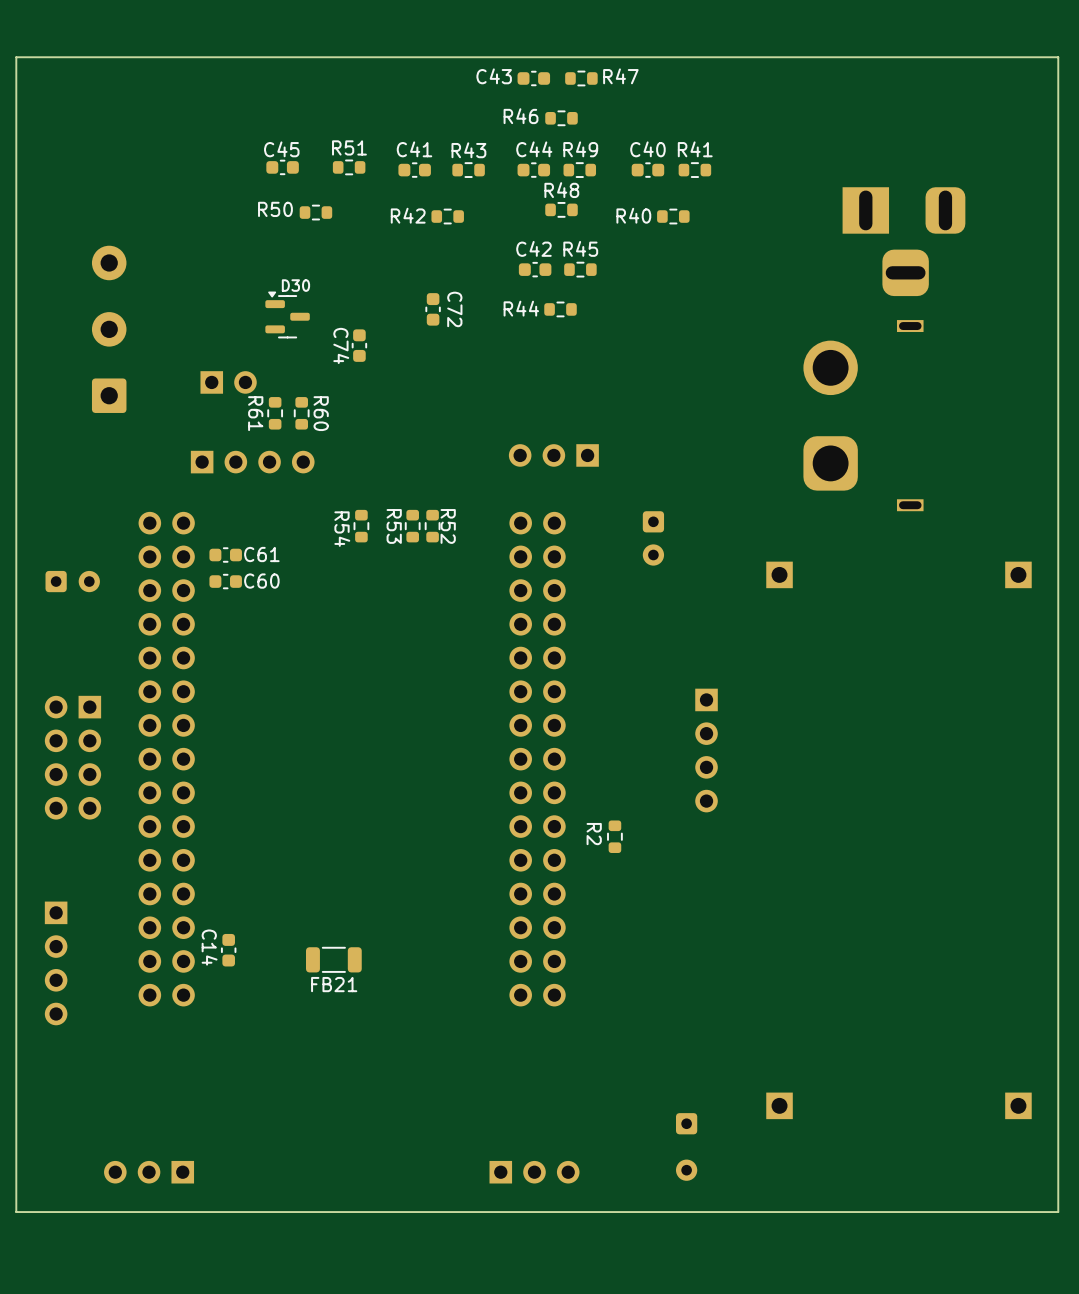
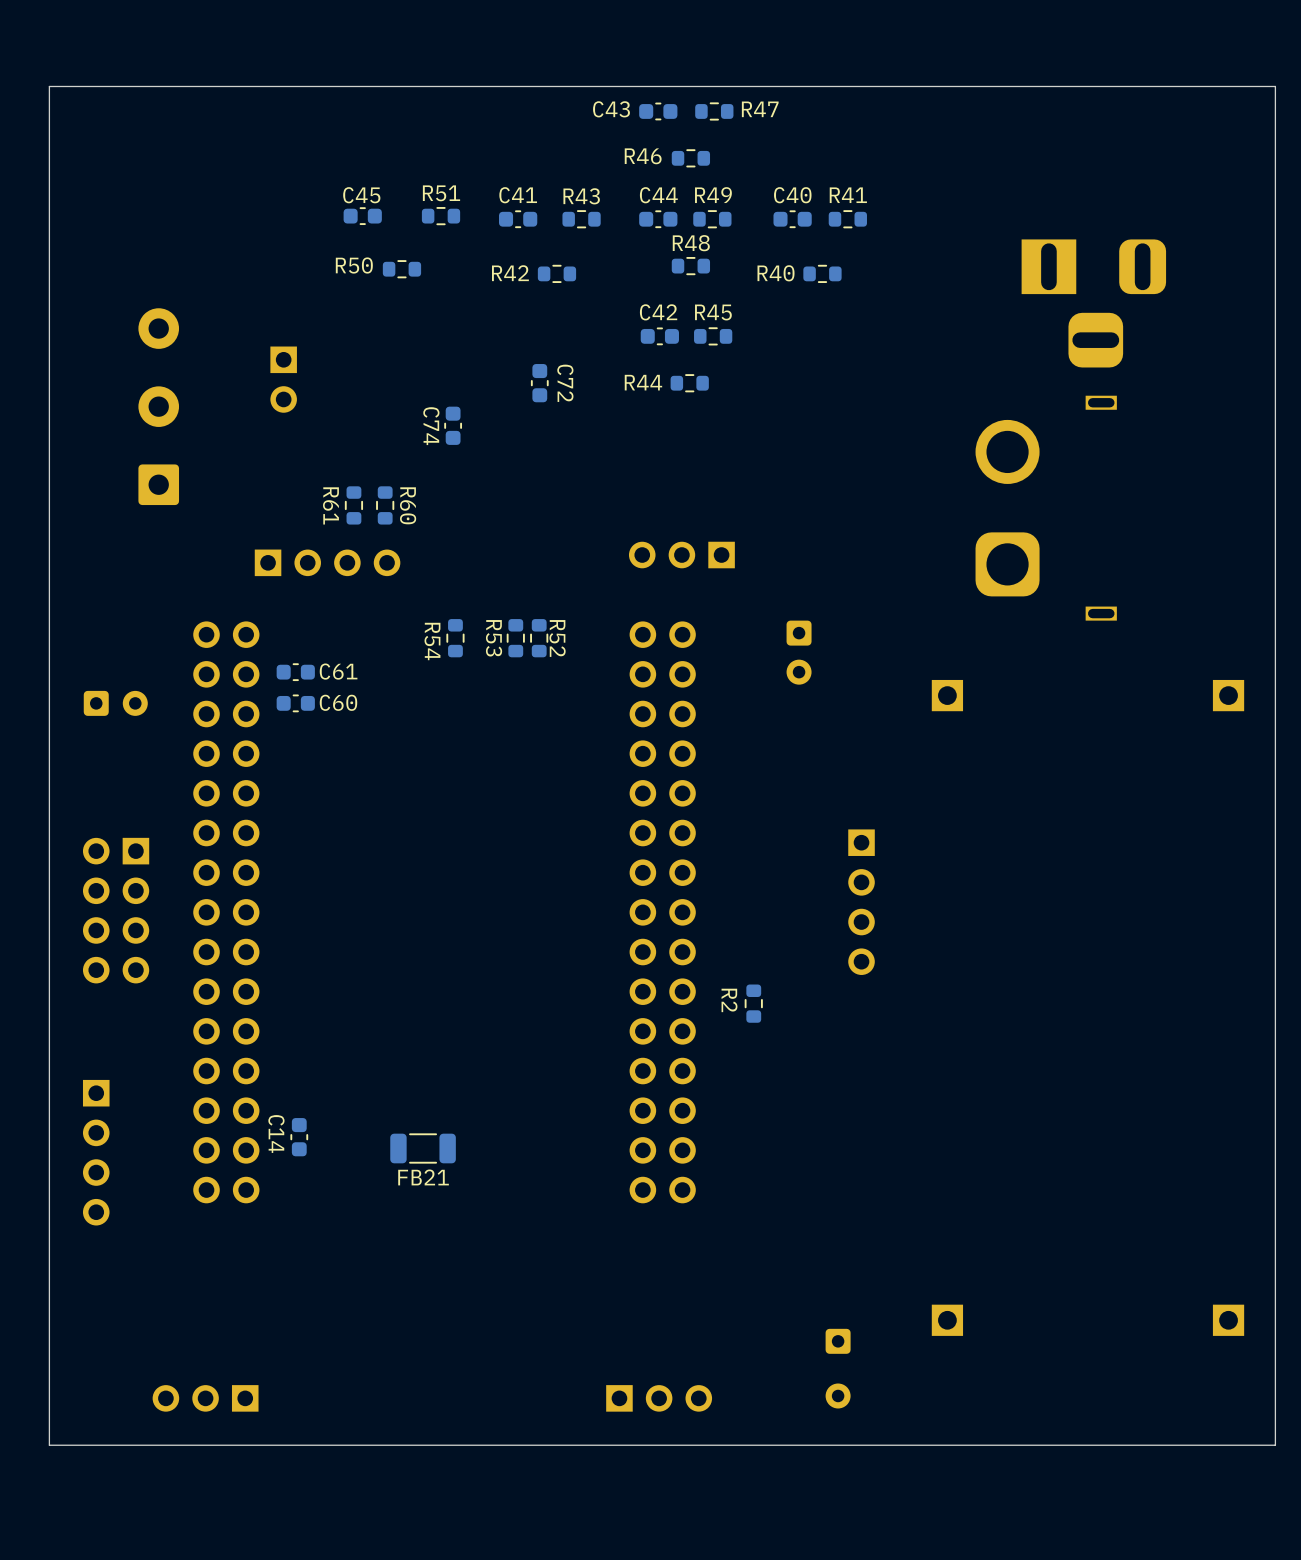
D30: (287, 314) -> none
part rotation: 0° (228, 382) -> 90° clockwise (283, 379)
part position: (228, 382) -> (283, 379)

